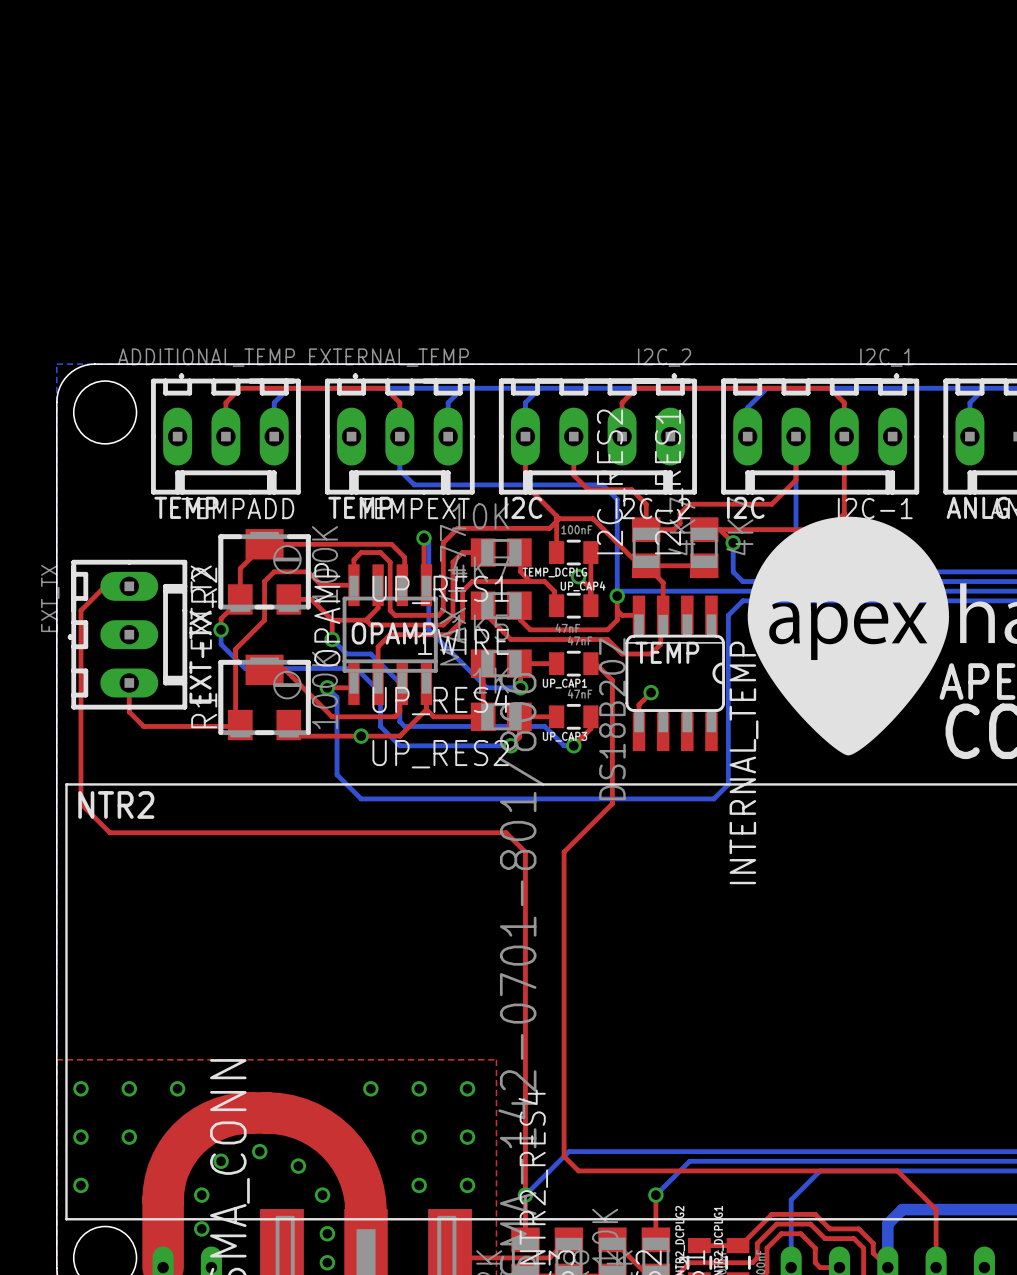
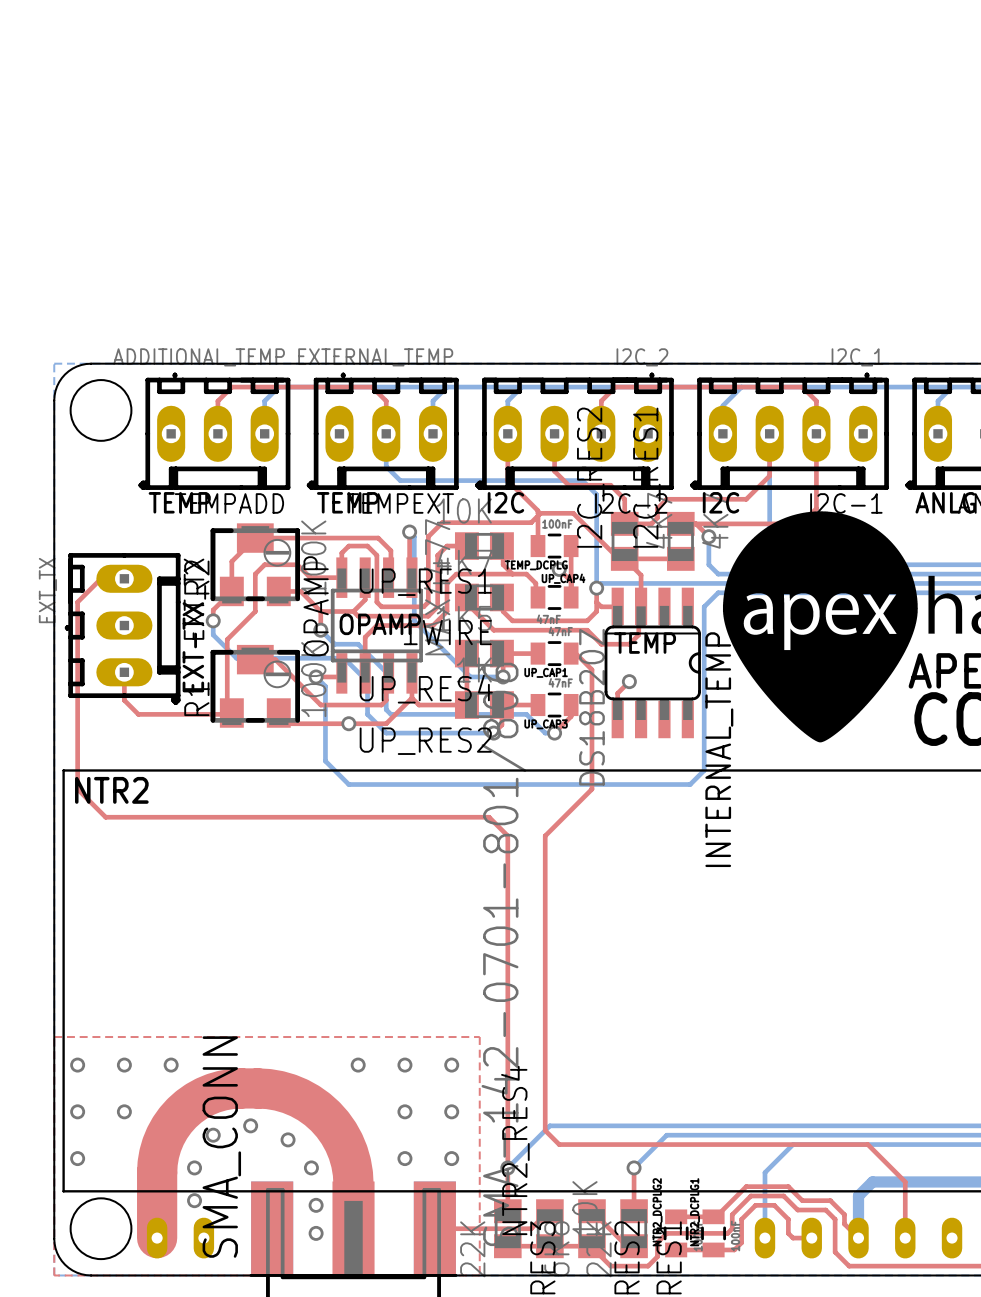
line: none -> (145, 482) (140, 485) (145, 487)
line: none -> (313, 482) (309, 485) (313, 487)
line: none -> (482, 482) (477, 485) (482, 487)
line: none -> (697, 482) (692, 485) (697, 487)
line: none -> (912, 482) (907, 485) (912, 487)
line: none -> (173, 698) (175, 702) (178, 698)

